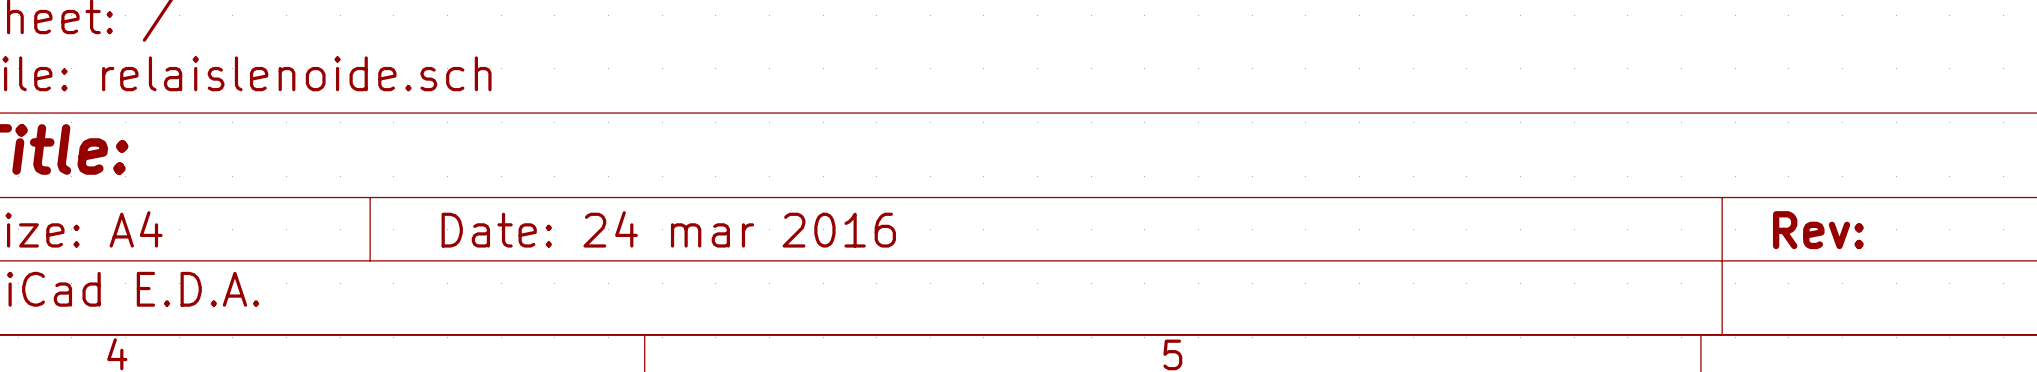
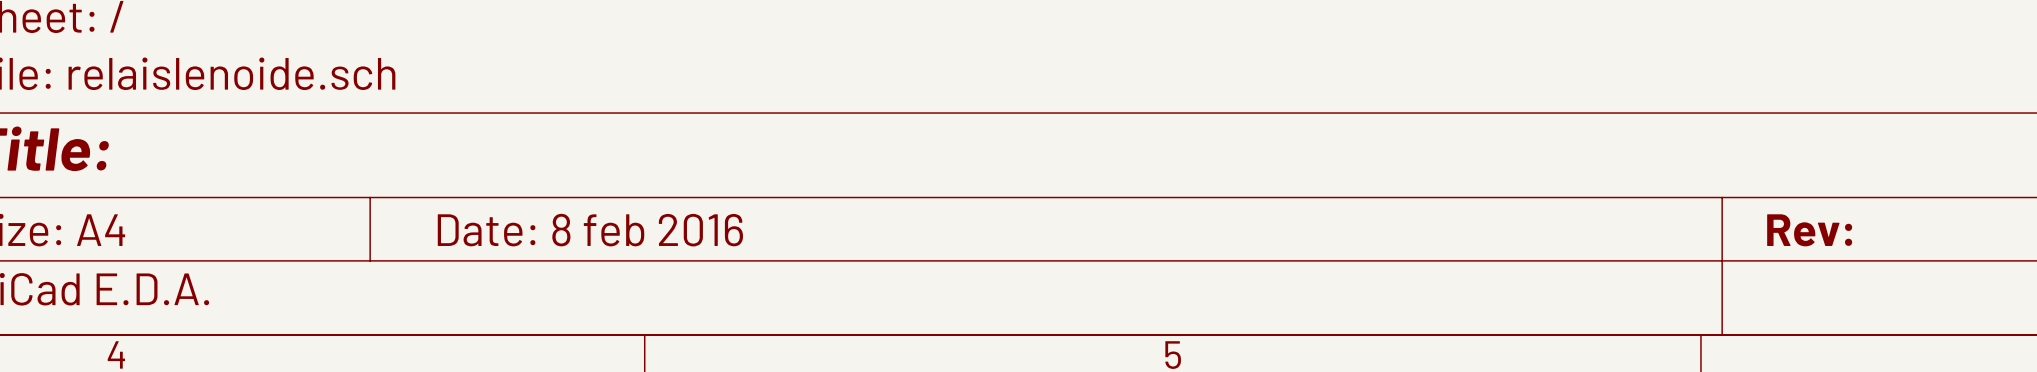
title block: Date: 24 mar 2016 (668, 229) -> Date: 8 feb 2016 (590, 230)

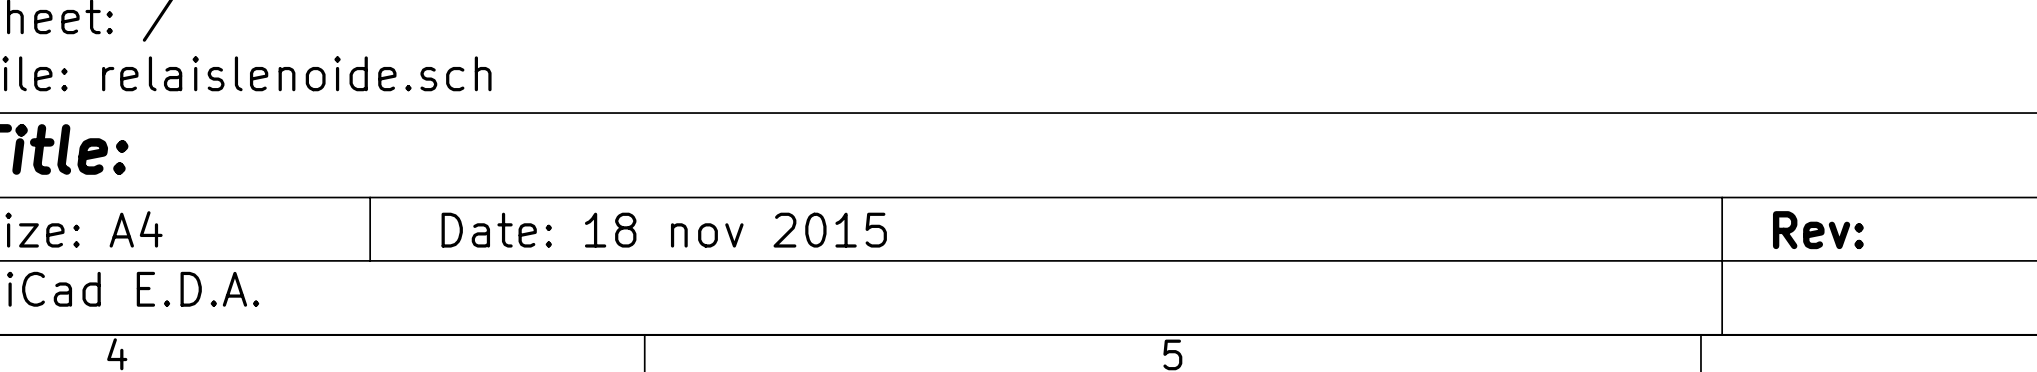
title block: Date: 8 feb 2016 (590, 230) -> Date: 18 nov 2015 (664, 230)

